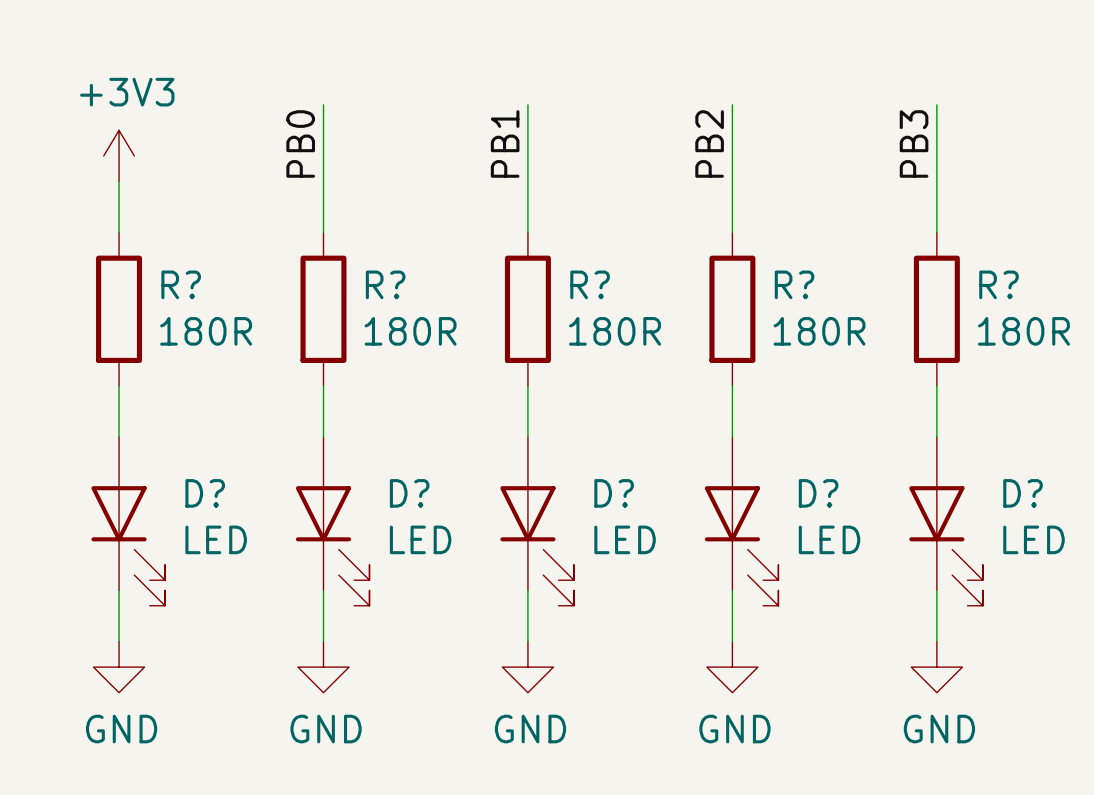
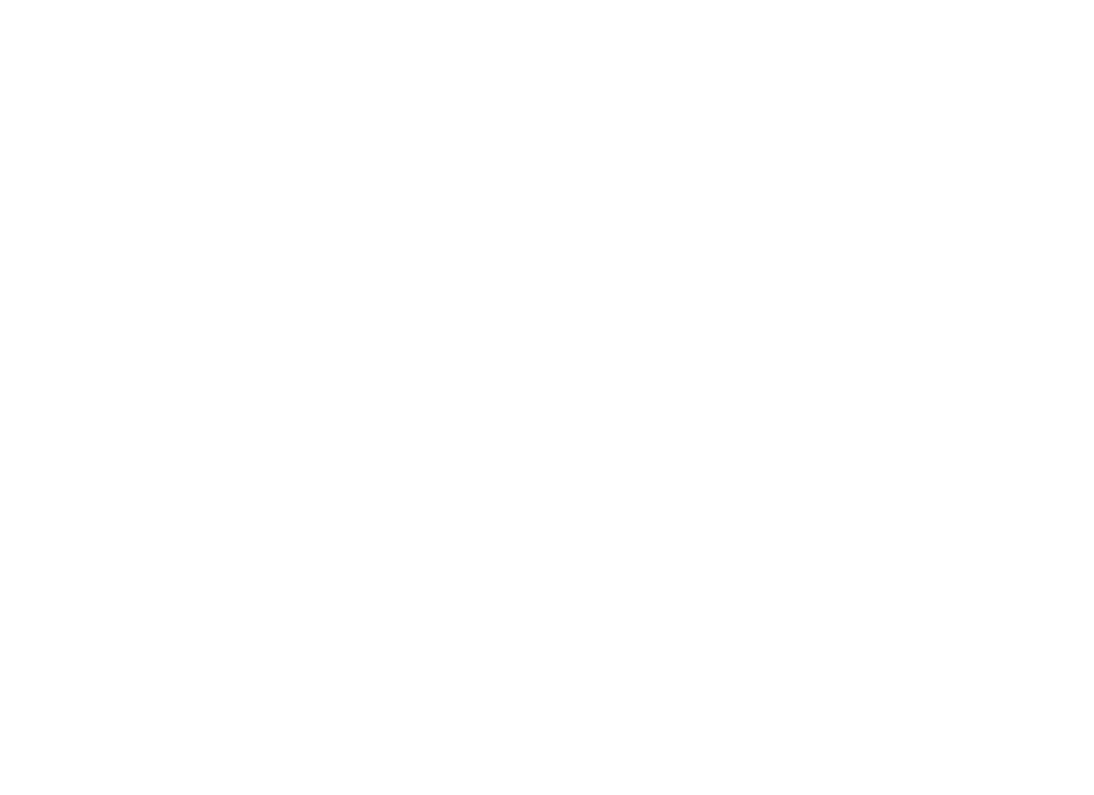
wire: (323, 104) (323, 232) -> none
wire: (527, 104) (527, 232) -> none
wire: (732, 104) (732, 232) -> none
wire: (936, 104) (936, 232) -> none
label: PB0 (300, 143) -> none
label: PB1 (505, 143) -> none
label: PB2 (709, 143) -> none
label: PB3 (914, 143) -> none
power symbol: +3V3 (119, 155) -> none
wire: (119, 181) (119, 232) -> none
R?: 180R (119, 309) -> none
R?: 180R (323, 309) -> none
R?: 180R (527, 309) -> none
R?: 180R (732, 309) -> none
R?: 180R (936, 309) -> none
wire: (119, 385) (119, 437) -> none
wire: (323, 385) (323, 437) -> none
wire: (527, 385) (527, 437) -> none
wire: (732, 385) (732, 437) -> none
wire: (936, 385) (936, 437) -> none
D?: LED (128, 521) -> none
D?: LED (332, 521) -> none
D?: LED (537, 521) -> none
D?: LED (741, 521) -> none
D?: LED (946, 521) -> none
wire: (119, 590) (119, 641) -> none
wire: (323, 590) (323, 641) -> none
wire: (527, 590) (527, 641) -> none
wire: (732, 590) (732, 641) -> none
wire: (936, 590) (936, 641) -> none
power symbol: GND (119, 667) -> none
power symbol: GND (323, 667) -> none
power symbol: GND (527, 667) -> none
power symbol: GND (732, 667) -> none
power symbol: GND (936, 667) -> none

